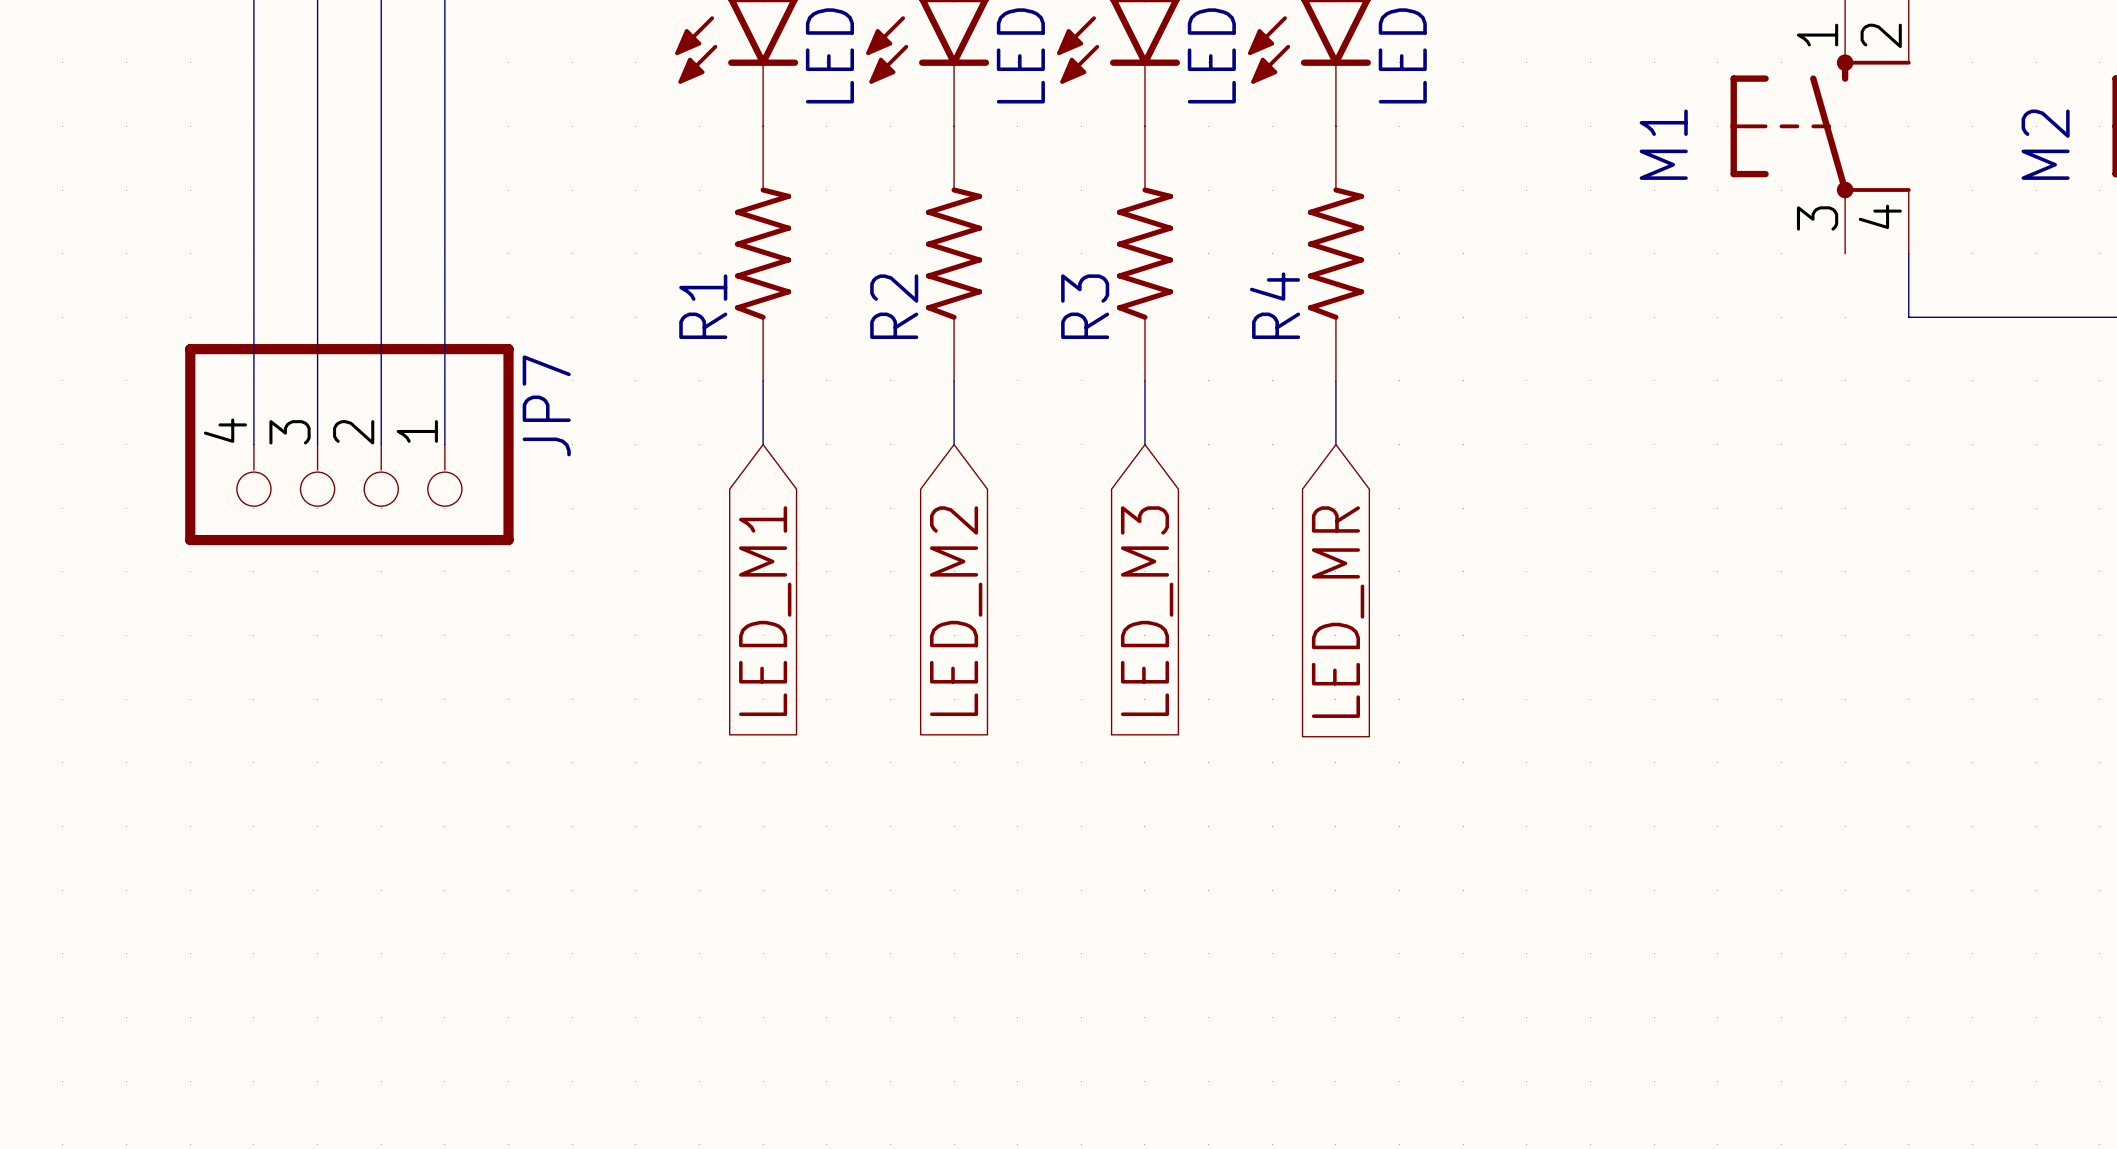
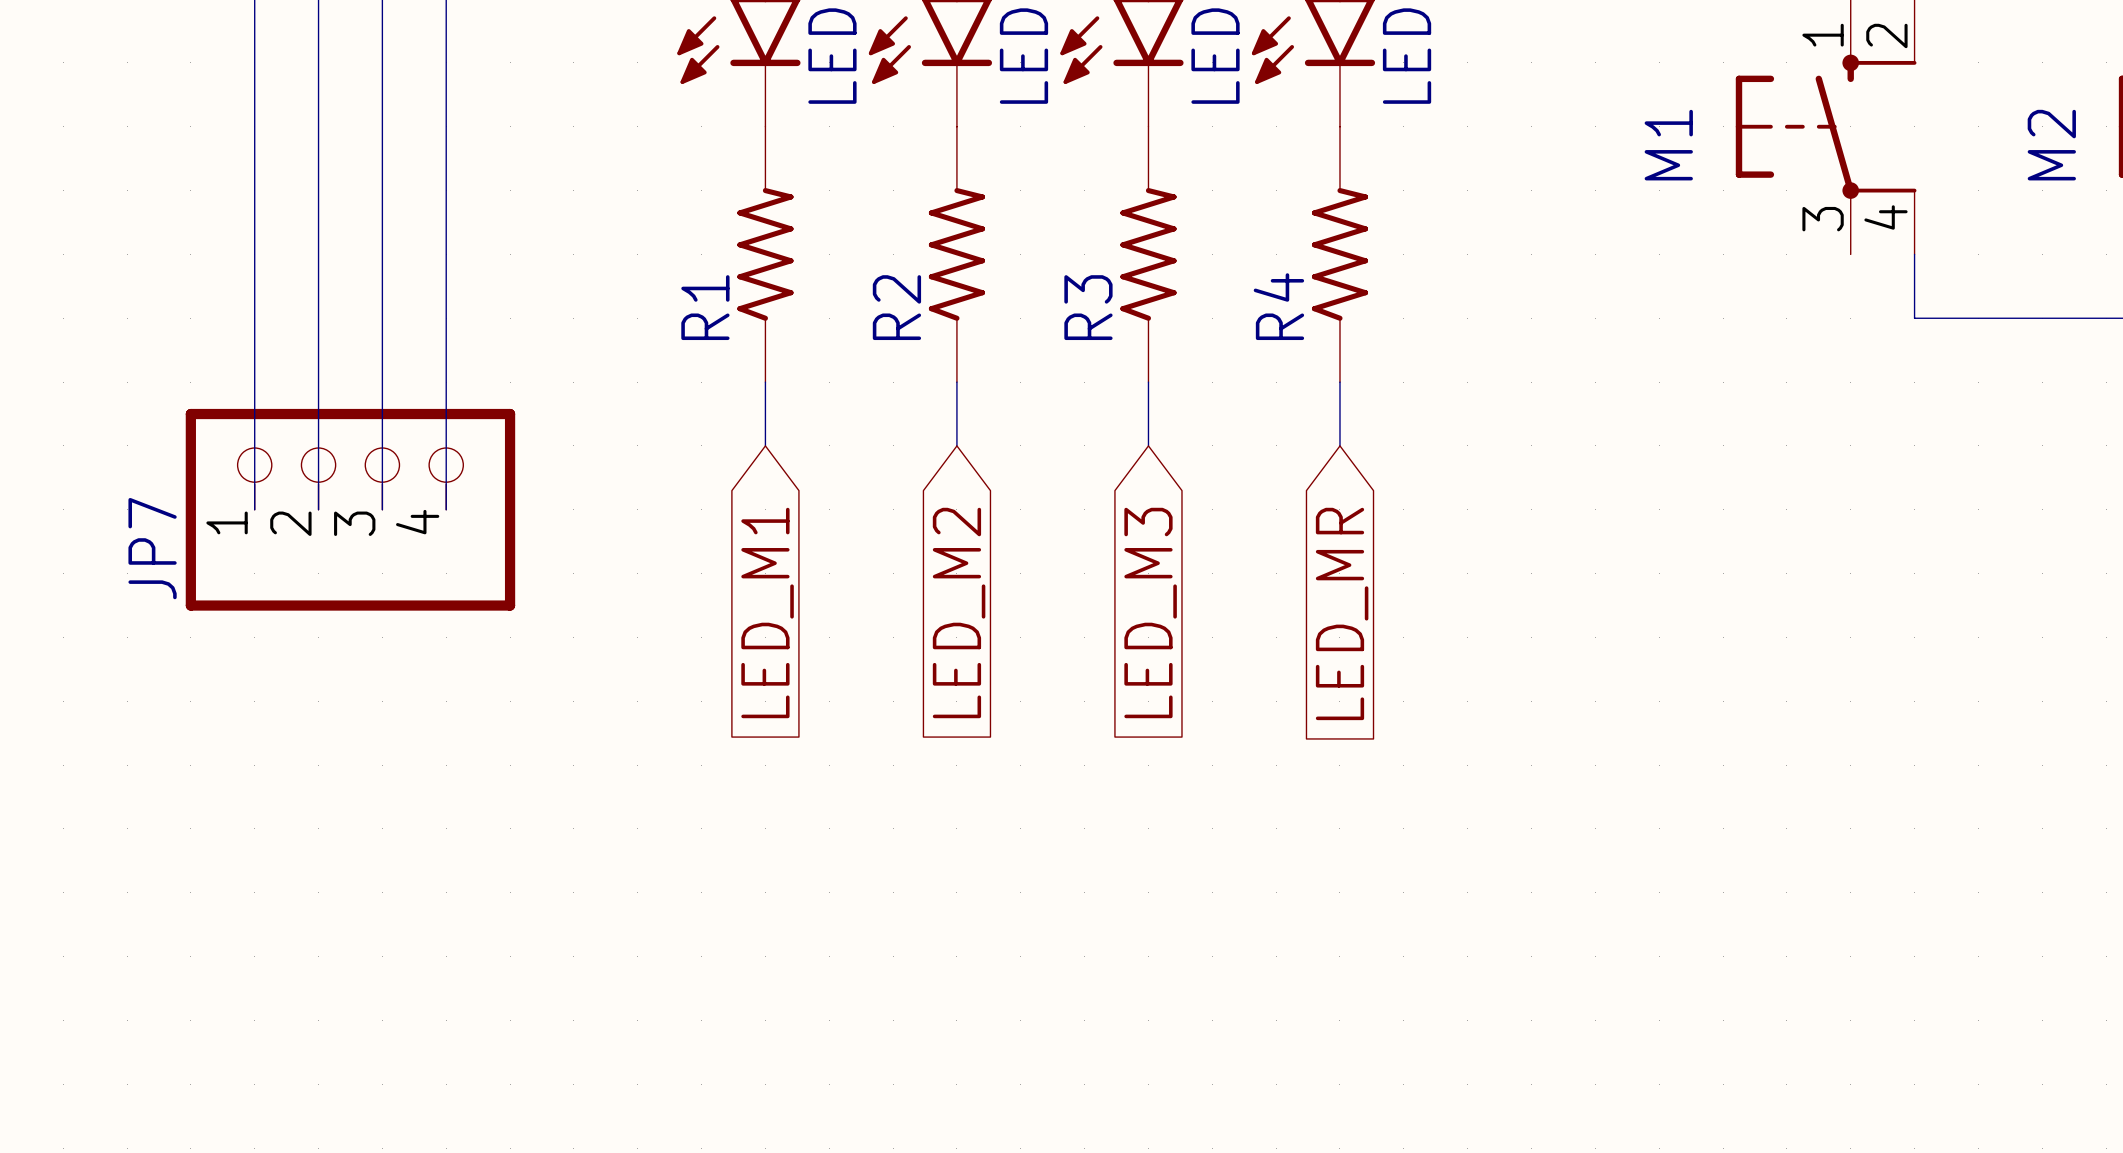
wire: none -> (254, 445) (254, 509)
wire: none -> (318, 445) (318, 509)
JP7 rotation: 0° (349, 444) -> 180° (350, 509)
wire: none -> (382, 445) (382, 509)
wire: none -> (446, 445) (446, 509)

